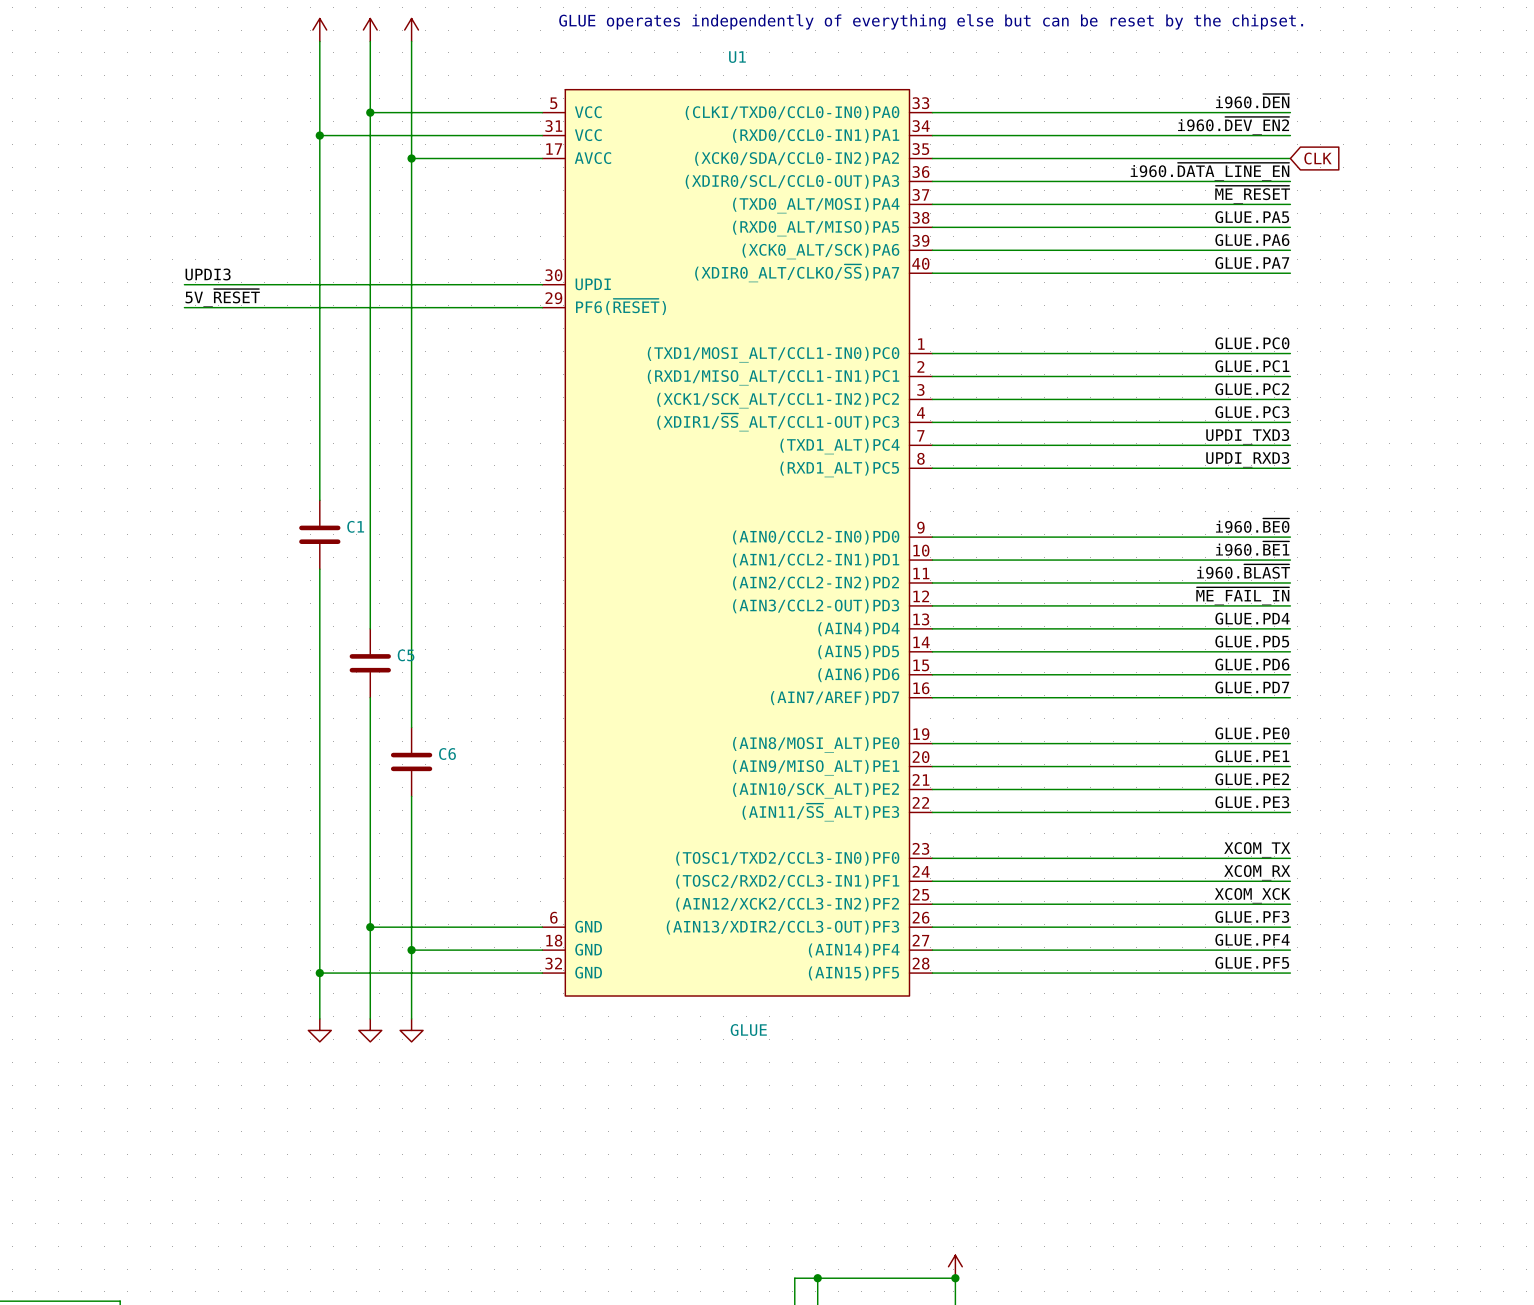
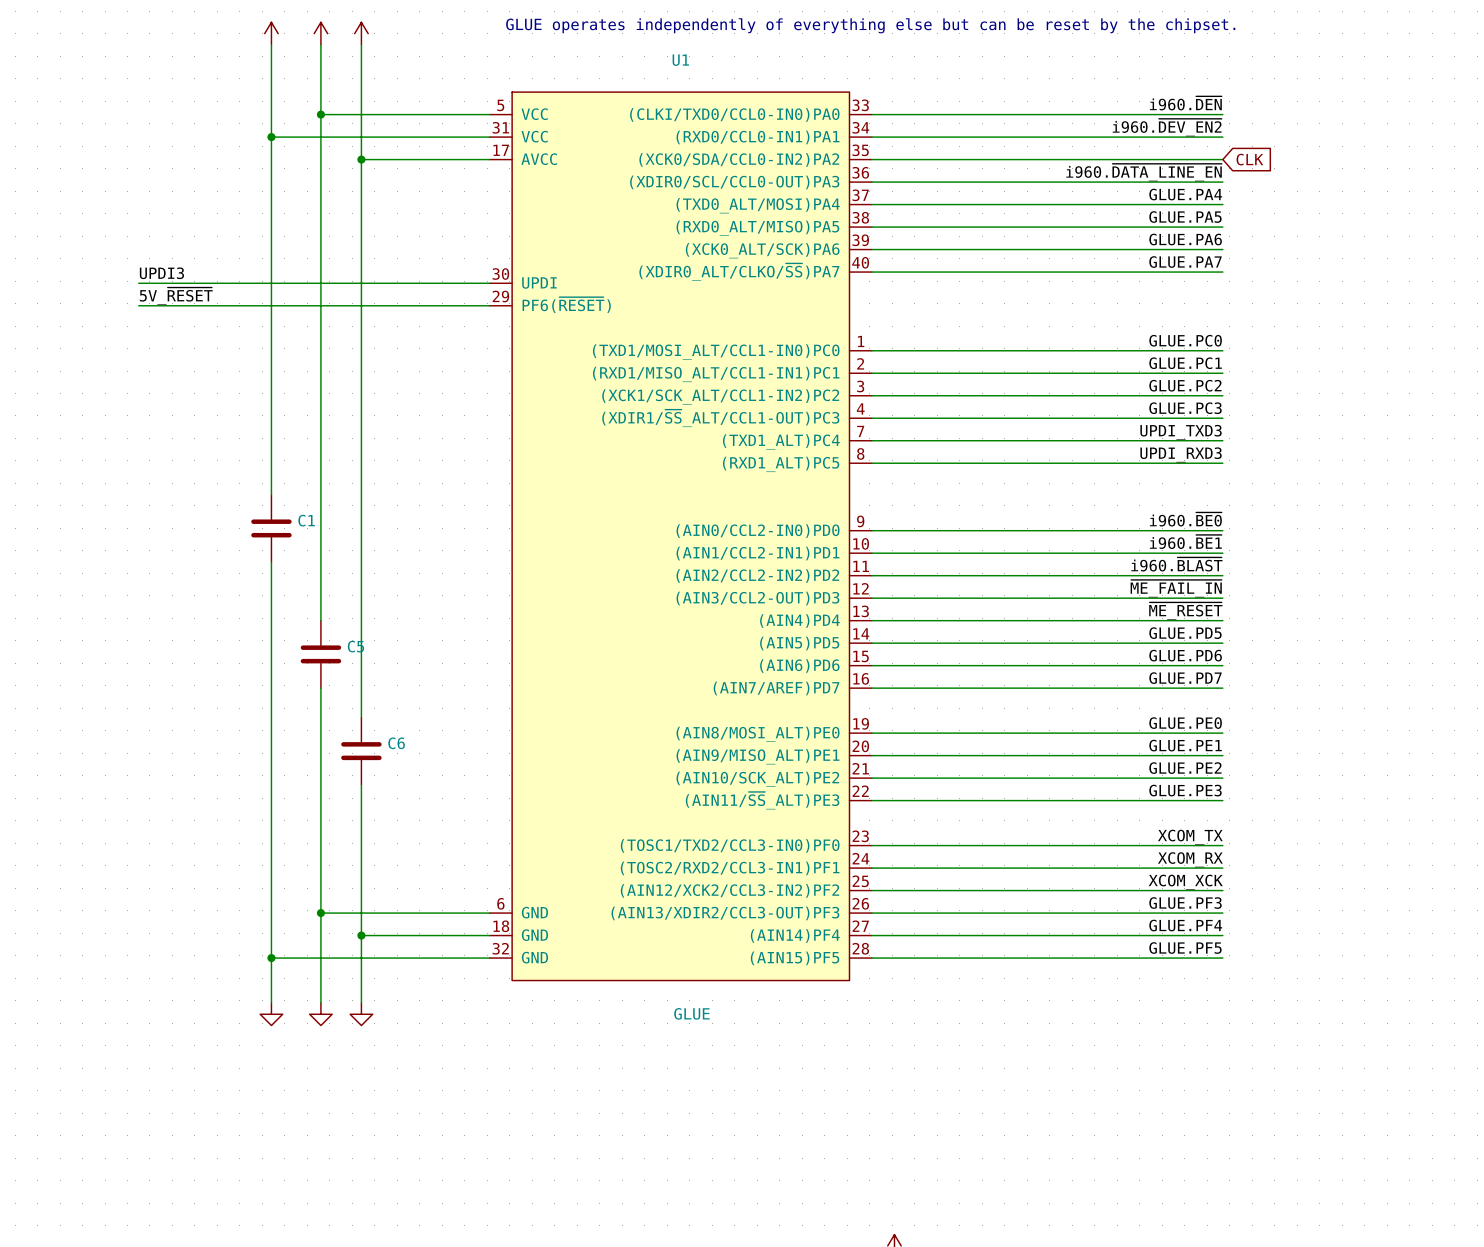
label: ~{ME_RESET} (1252, 194) -> GLUE.PA4 (1185, 194)
label: GLUE.PD4 (1252, 618) -> ~{ME_RESET} (1185, 611)

